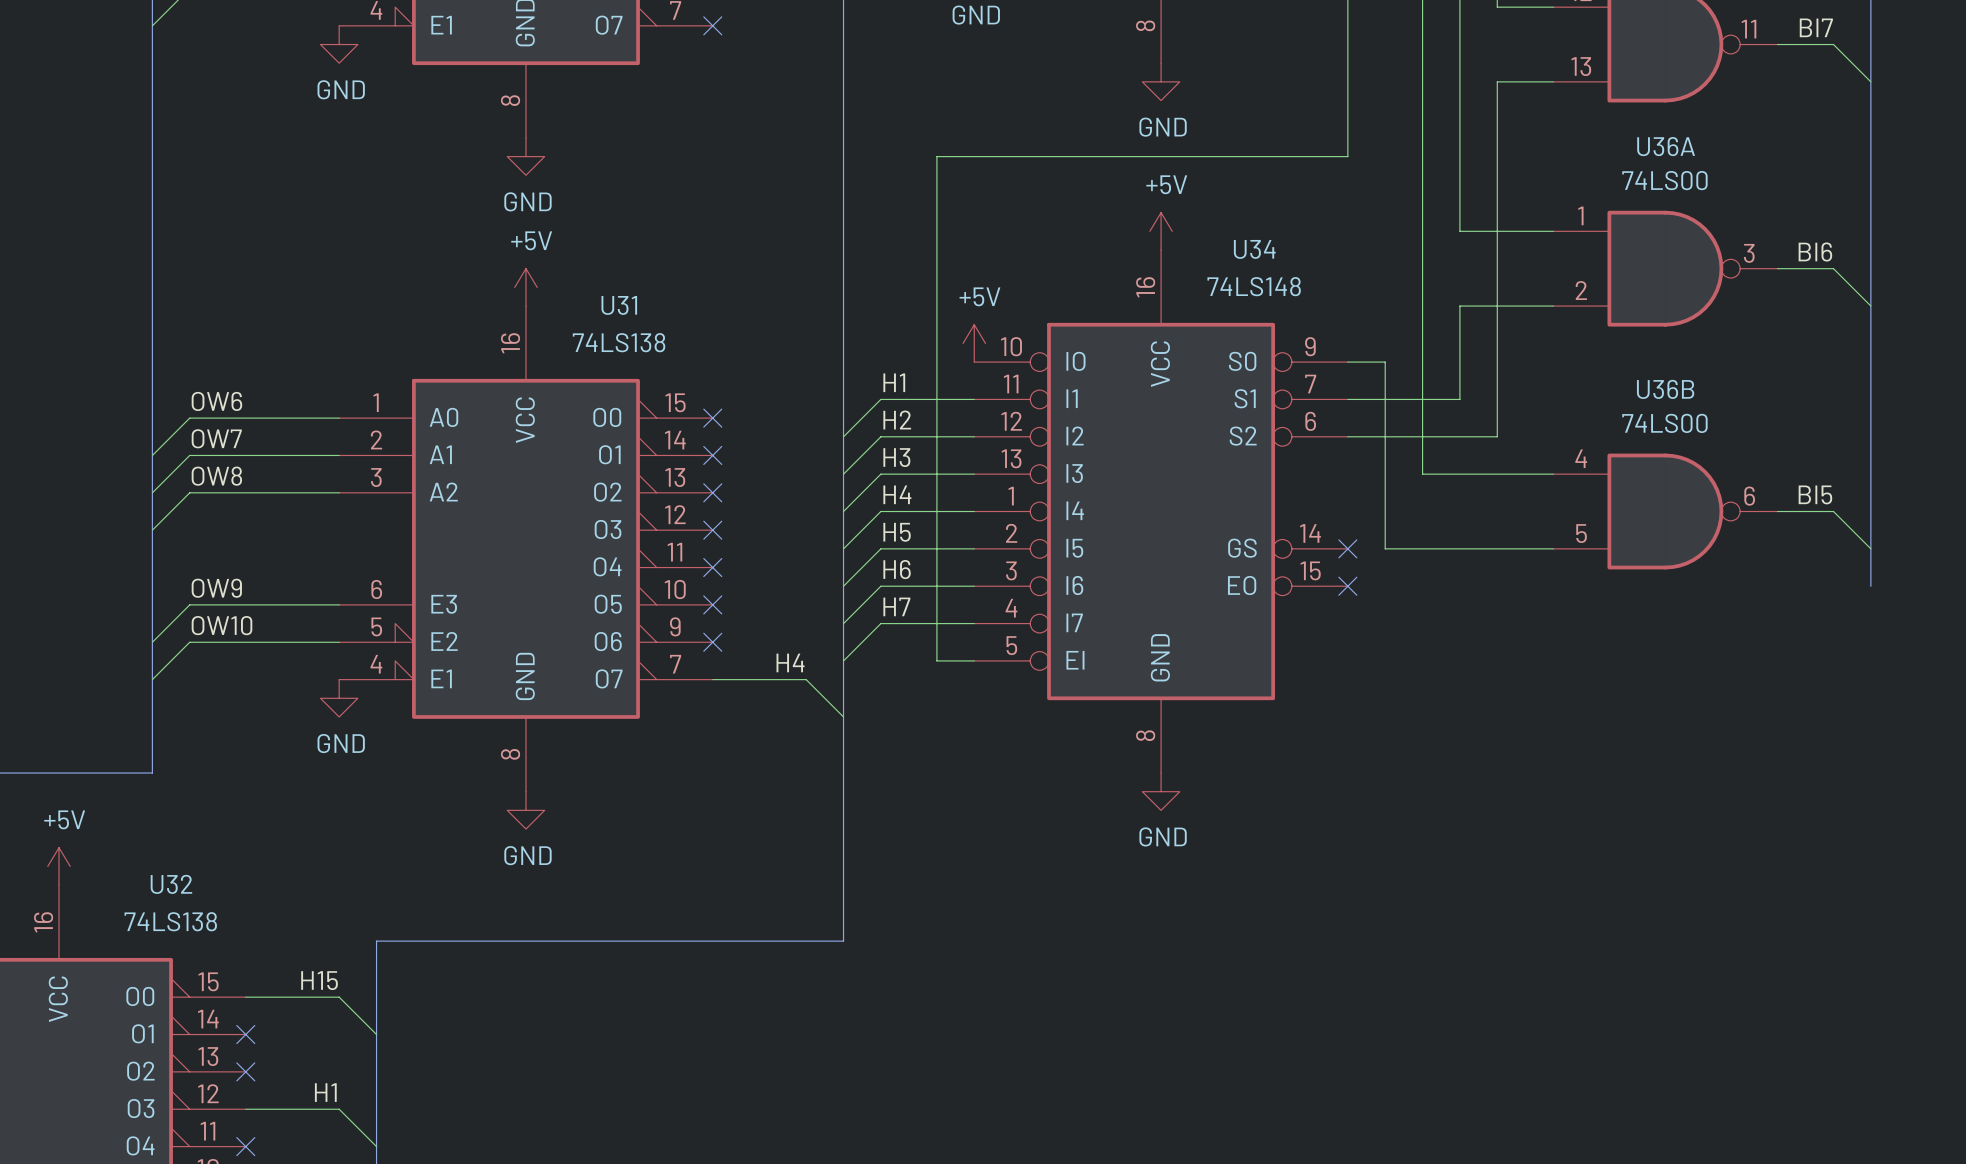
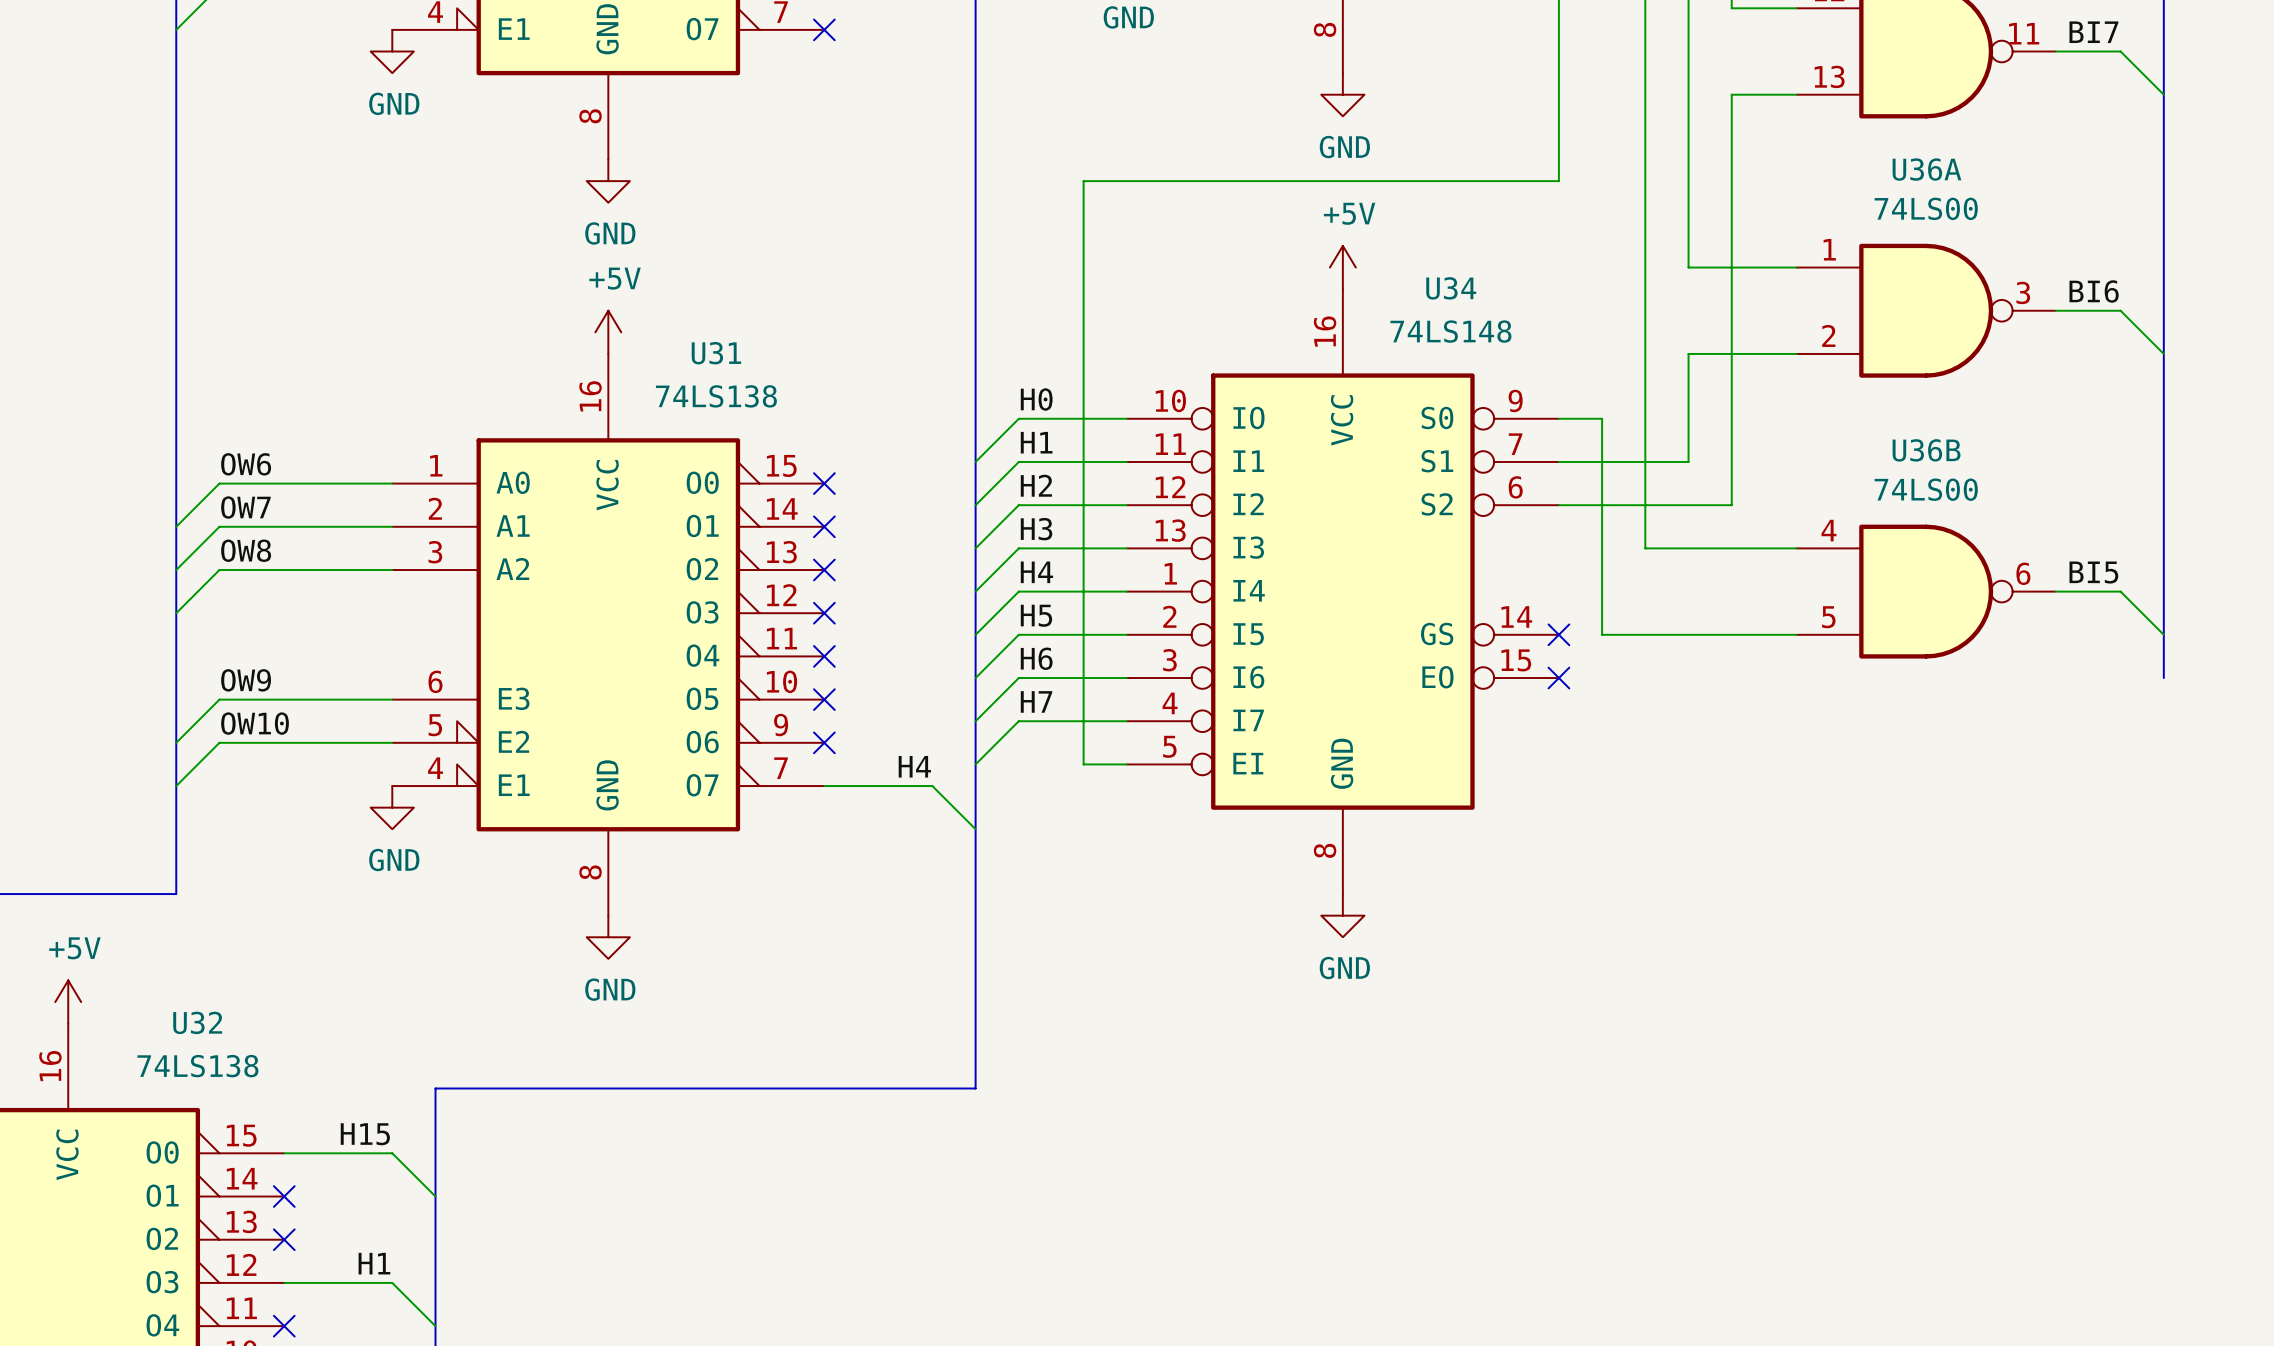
power symbol: +5V (974, 343) -> none
label: none -> H0 (1036, 399)
wire: none -> (1126, 418) (1018, 418) (975, 461)

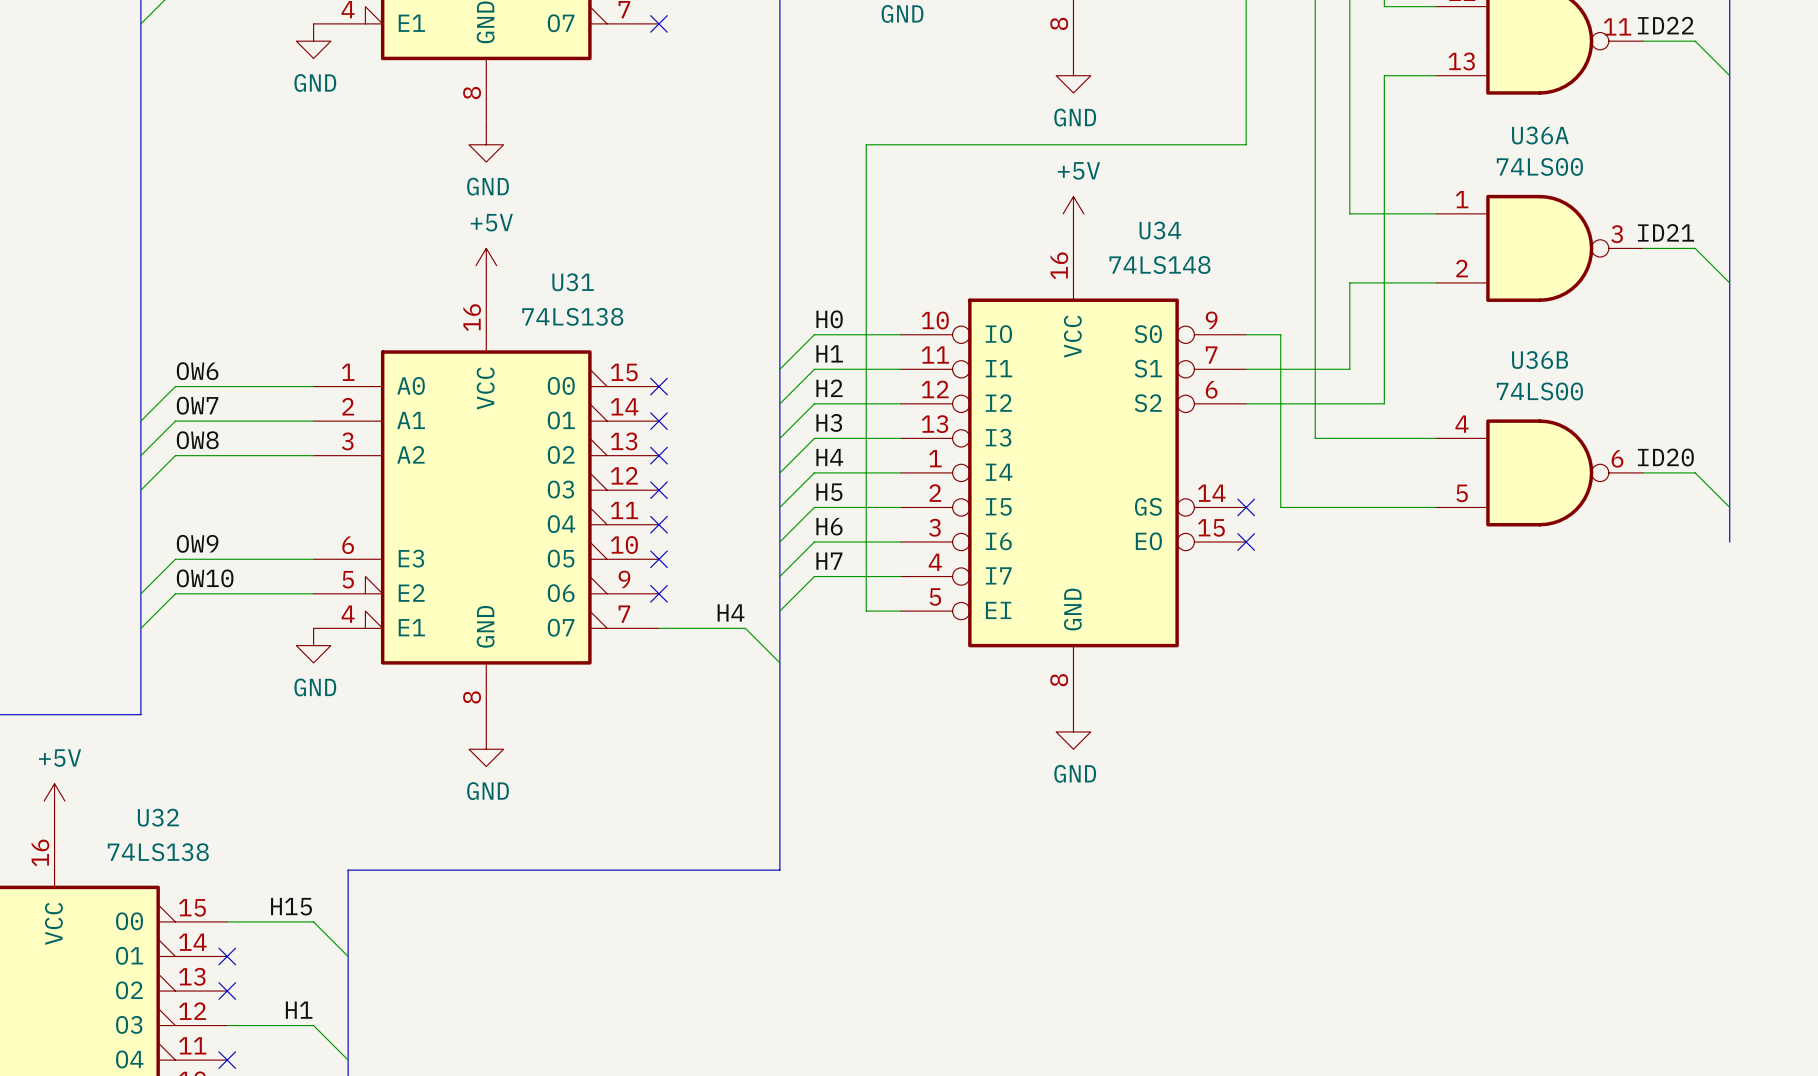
label: BI7 (2093, 32) -> ID22 (1665, 25)
label: BI6 (2094, 291) -> ID21 (1665, 232)
label: BI5 (2093, 572) -> ID20 (1665, 457)

